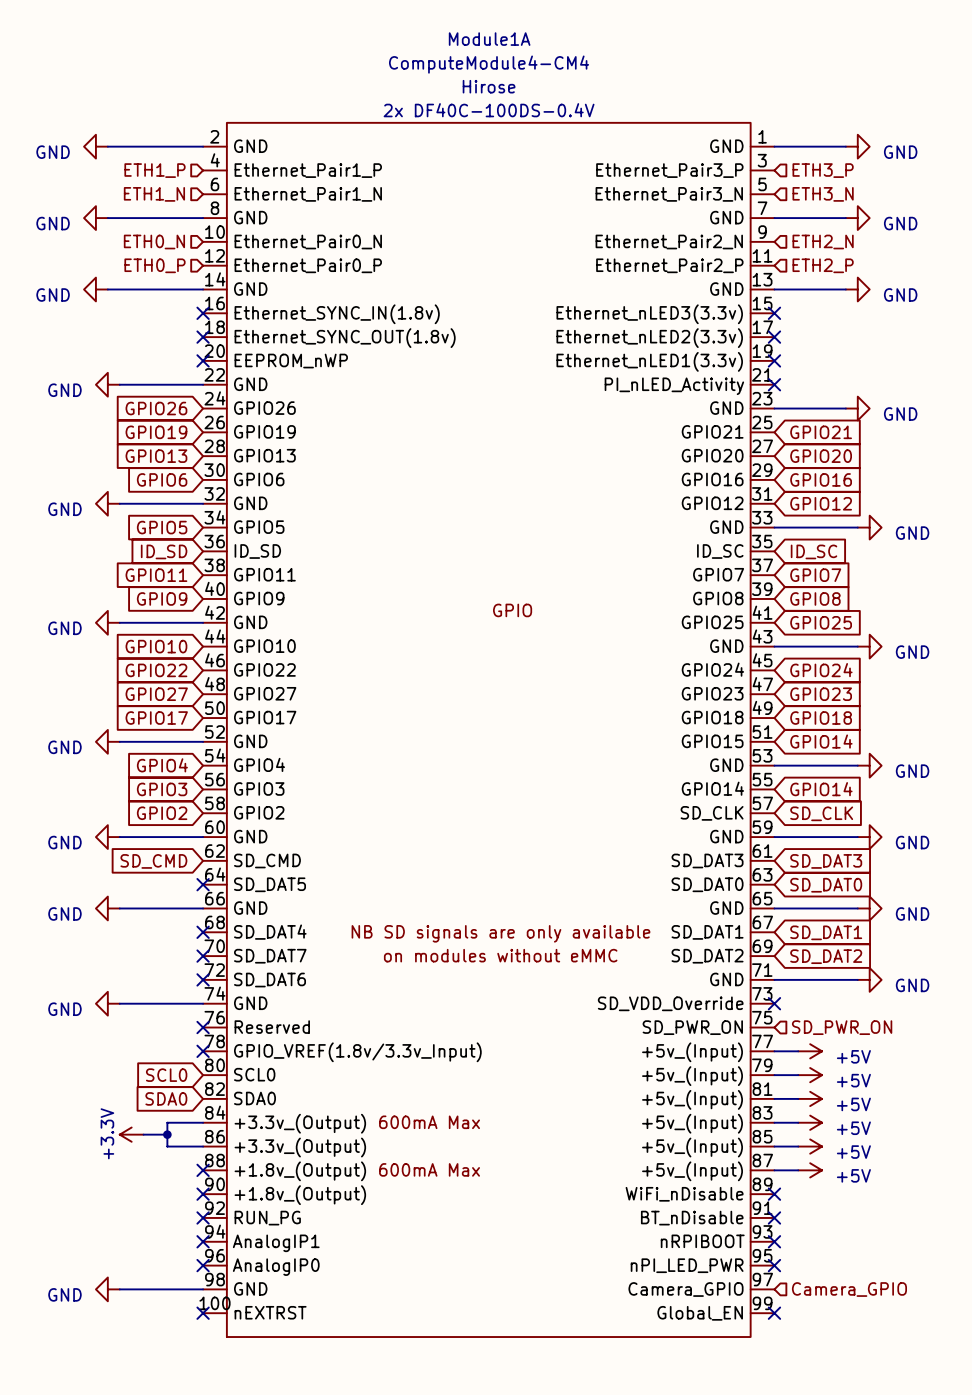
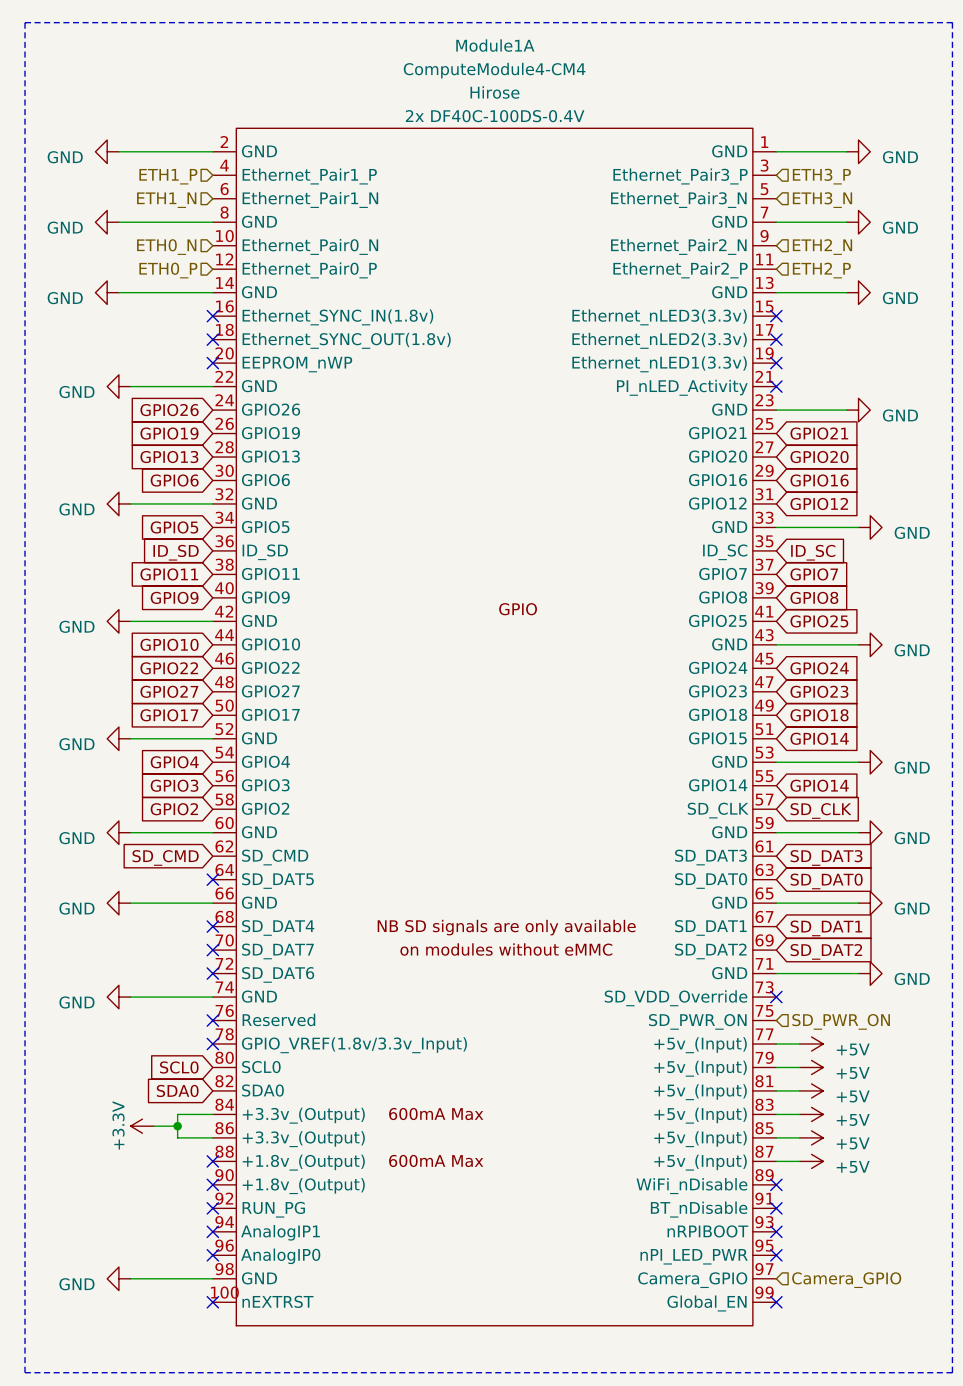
line: none -> (25, 22) (952, 22) (952, 1372) (25, 1372) (25, 22)

